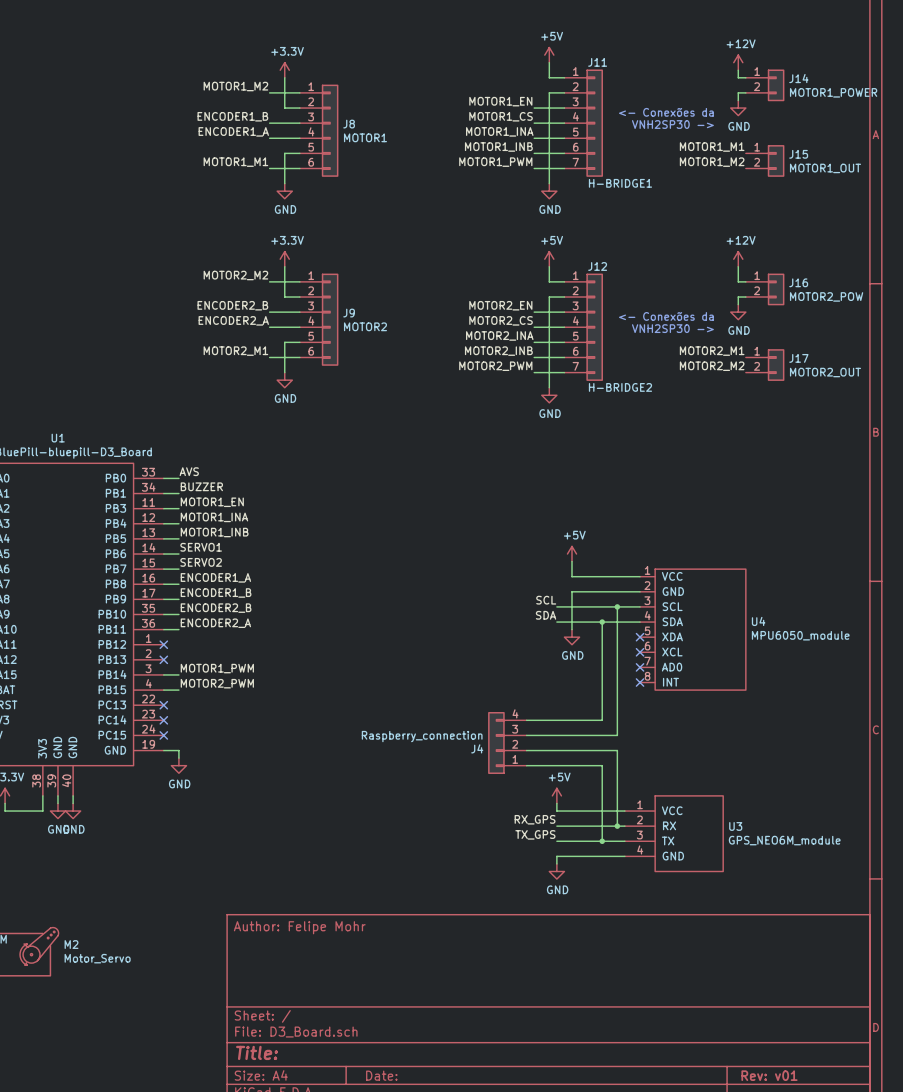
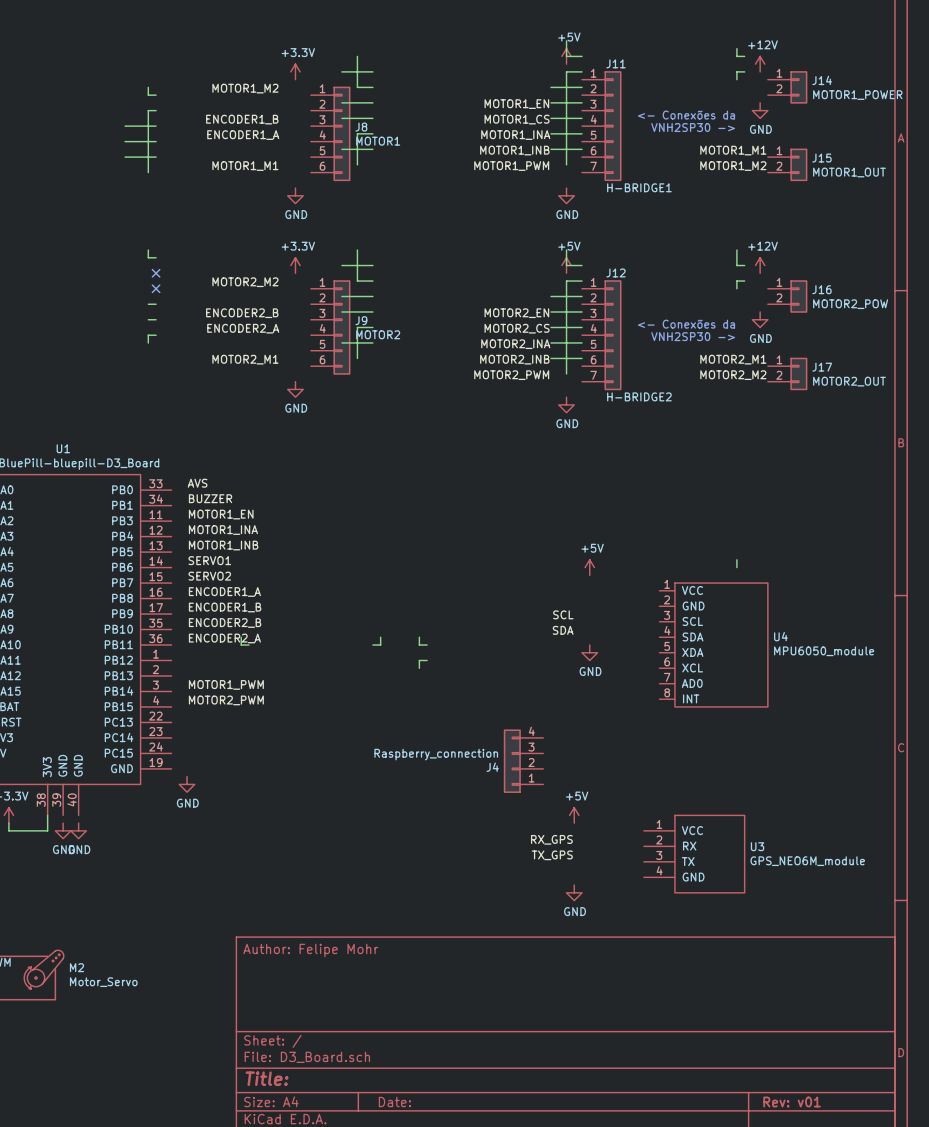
wire: none -> (566, 40) (566, 56) (582, 56)
wire: (549, 62) (549, 70) -> (582, 71) (566, 71)
wire: (738, 70) (738, 77) (745, 77) -> (736, 48) (736, 56) (744, 56)
wire: (284, 77) (284, 108) (299, 108) -> (357, 56) (357, 87) (372, 87)
wire: (549, 77) (564, 77) -> (566, 79) (566, 95)
wire: none -> (148, 87) (148, 95) (156, 95)
wire: (269, 92) (299, 92) -> (341, 71) (372, 71)
wire: (549, 92) (564, 92) -> none
wire: (745, 92) (738, 92) (738, 100) -> (744, 71) (736, 71) (736, 79)
wire: none -> (156, 110) (148, 110) (148, 172)
wire: (534, 108) (564, 108) -> (551, 87) (582, 87)
wire: none -> (125, 126) (156, 126)
wire: (269, 123) (299, 123) -> (341, 102) (372, 102)
wire: (534, 123) (564, 123) -> (551, 102) (582, 102)
wire: none -> (125, 141) (156, 141)
wire: (269, 138) (299, 138) -> (341, 118) (372, 118)
wire: (534, 138) (564, 138) -> (551, 118) (582, 118)
wire: none -> (125, 157) (156, 157)
wire: (299, 153) (284, 153) (284, 183) -> (372, 133) (357, 133) (357, 164)
wire: (534, 153) (564, 153) -> (551, 133) (582, 133)
wire: (549, 160) (549, 183) -> none
wire: (269, 168) (299, 168) -> (341, 149) (372, 149)
wire: (534, 168) (564, 168) -> (551, 149) (582, 149)
wire: none -> (148, 250) (148, 257) (156, 257)
wire: none -> (566, 250) (566, 265) (582, 265)
no-connect mark: none -> (156, 273)
wire: (284, 266) (284, 297) (299, 297) -> (357, 250) (357, 281) (372, 281)
wire: (549, 266) (549, 274) -> (582, 281) (566, 281)
wire: (738, 266) (738, 281) (745, 281) -> (736, 250) (736, 265) (744, 265)
no-connect mark: none -> (156, 288)
wire: (269, 281) (299, 281) -> (341, 265) (372, 265)
wire: (549, 281) (564, 281) -> (566, 288) (566, 304)
wire: none -> (148, 304) (156, 304)
wire: (549, 297) (564, 297) -> none
wire: (745, 297) (738, 297) (738, 304) -> (744, 281) (736, 281) (736, 288)
wire: none -> (148, 319) (156, 319)
wire: (269, 312) (299, 312) -> (341, 296) (372, 296)
wire: (534, 312) (564, 312) -> (551, 296) (582, 296)
wire: none -> (156, 335) (148, 335) (148, 342)
wire: (269, 327) (299, 327) -> (341, 311) (372, 311)
wire: (534, 327) (564, 327) -> (551, 311) (582, 311)
wire: (299, 342) (284, 342) (284, 372) -> (372, 327) (357, 327) (357, 358)
wire: (534, 342) (564, 342) -> (551, 327) (582, 327)
wire: (269, 357) (299, 357) -> (341, 342) (372, 342)
wire: (534, 357) (564, 357) -> (551, 342) (582, 342)
wire: (549, 365) (549, 387) -> none
wire: (534, 372) (564, 372) -> (551, 358) (582, 358)
wire: (163, 478) (178, 478) -> none
wire: (163, 493) (178, 493) -> none
wire: (163, 508) (178, 508) -> none
wire: (163, 523) (178, 523) -> none
wire: (163, 538) (178, 538) -> none
wire: none -> (736, 559) (736, 567)
wire: (163, 554) (178, 554) -> none
wire: (572, 561) (572, 576) (640, 576) -> none
wire: (163, 569) (178, 569) -> none
wire: (163, 584) (178, 584) -> none
wire: (640, 591) (572, 591) (572, 629) -> none
wire: (163, 599) (178, 599) -> none
wire: (556, 606) (640, 606) -> none
wire: (617, 606) (617, 735) (526, 735) -> none
junction: (617, 606) -> none
wire: (163, 614) (178, 614) -> none
wire: none -> (241, 637) (241, 645) (248, 645)
wire: none -> (380, 637) (380, 645) (372, 645)
wire: none -> (419, 637) (419, 645) (427, 645)
wire: (556, 622) (640, 622) -> none
wire: (602, 622) (602, 720) (526, 720) -> none
junction: (602, 622) -> none
wire: (163, 629) (178, 629) -> none
no-connect mark: (640, 637) -> none
no-connect mark: (163, 644) -> none
wire: none -> (427, 660) (419, 660) (419, 668)
no-connect mark: (640, 652) -> none
no-connect mark: (163, 659) -> none
no-connect mark: (640, 667) -> none
wire: (163, 674) (178, 674) -> none
no-connect mark: (640, 682) -> none
wire: (163, 690) (178, 690) -> none
no-connect mark: (163, 705) -> none
no-connect mark: (163, 720) -> none
no-connect mark: (163, 735) -> none
wire: (163, 750) (178, 750) (178, 758) -> none
wire: (526, 750) (617, 750) (617, 826) -> none
wire: (526, 765) (602, 765) (602, 841) -> none
wire: (57, 795) (57, 803) -> none
wire: (73, 795) (73, 803) -> none
wire: (556, 803) (556, 811) (624, 811) -> none
wire: (556, 826) (624, 826) -> none
junction: (617, 826) -> none
wire: (556, 841) (624, 841) -> none
junction: (602, 841) -> none
wire: (624, 856) (556, 856) (556, 863) -> none

